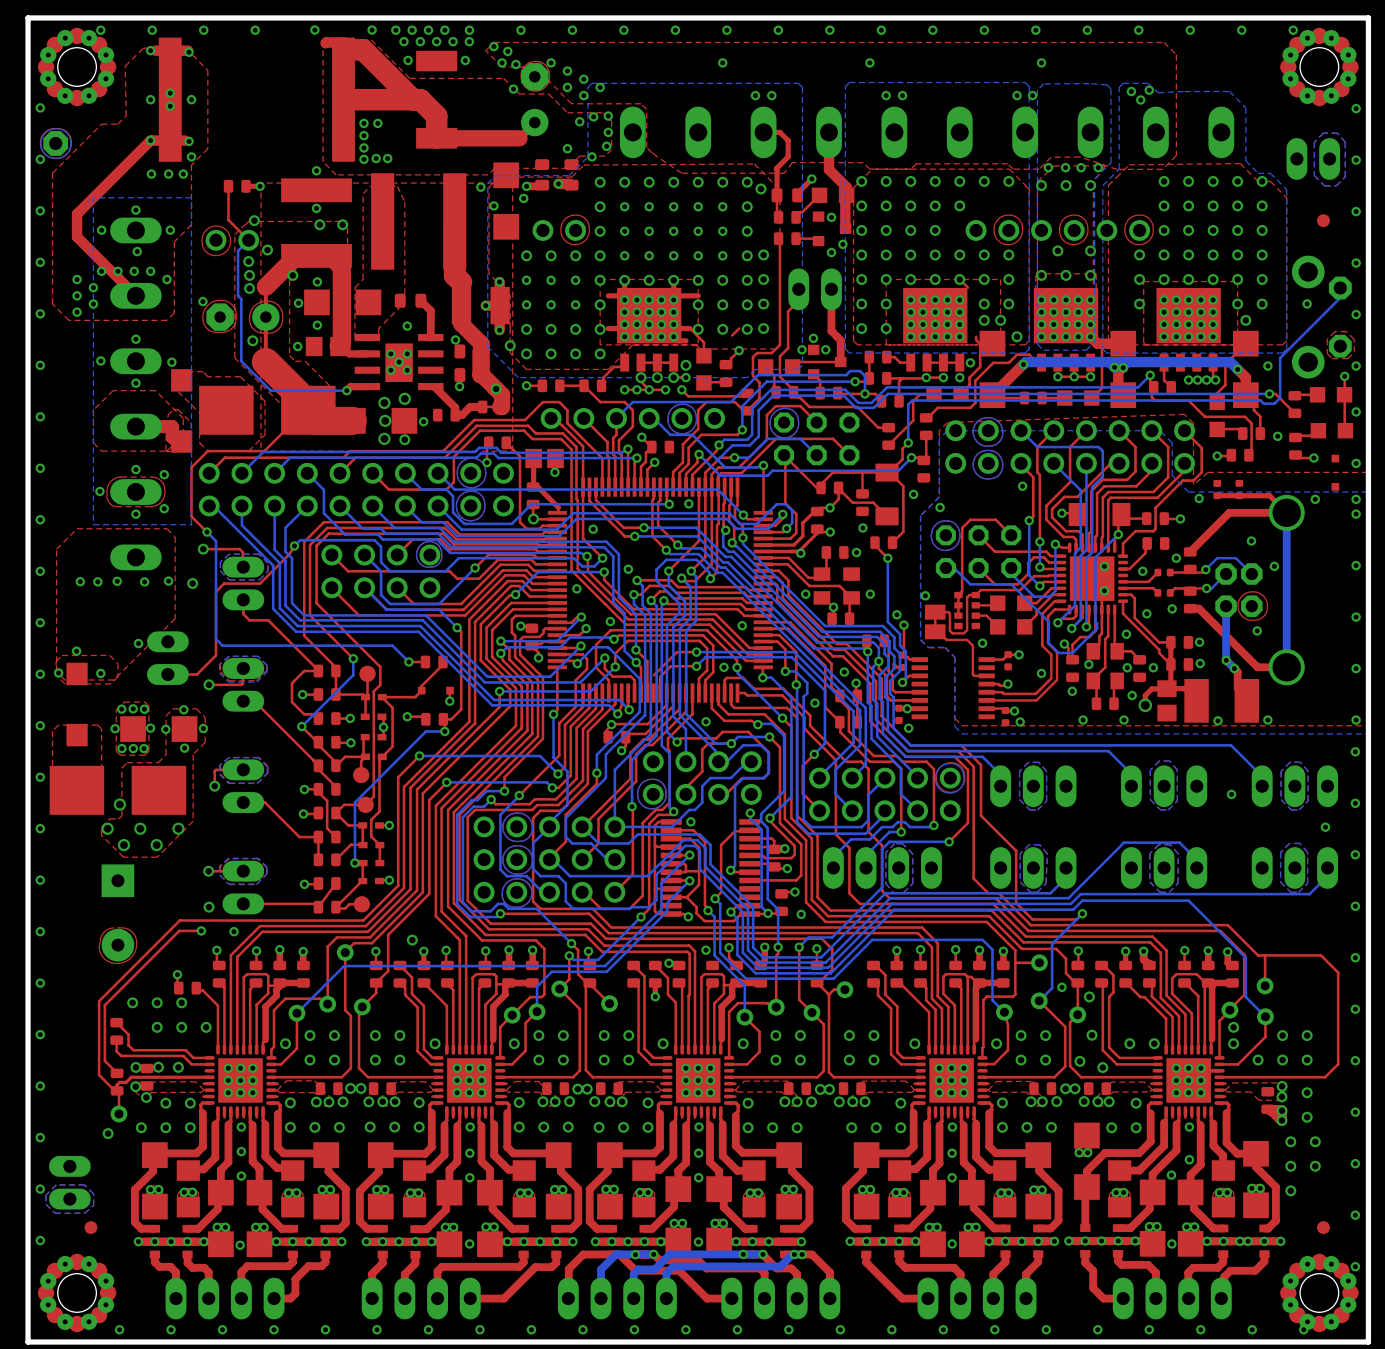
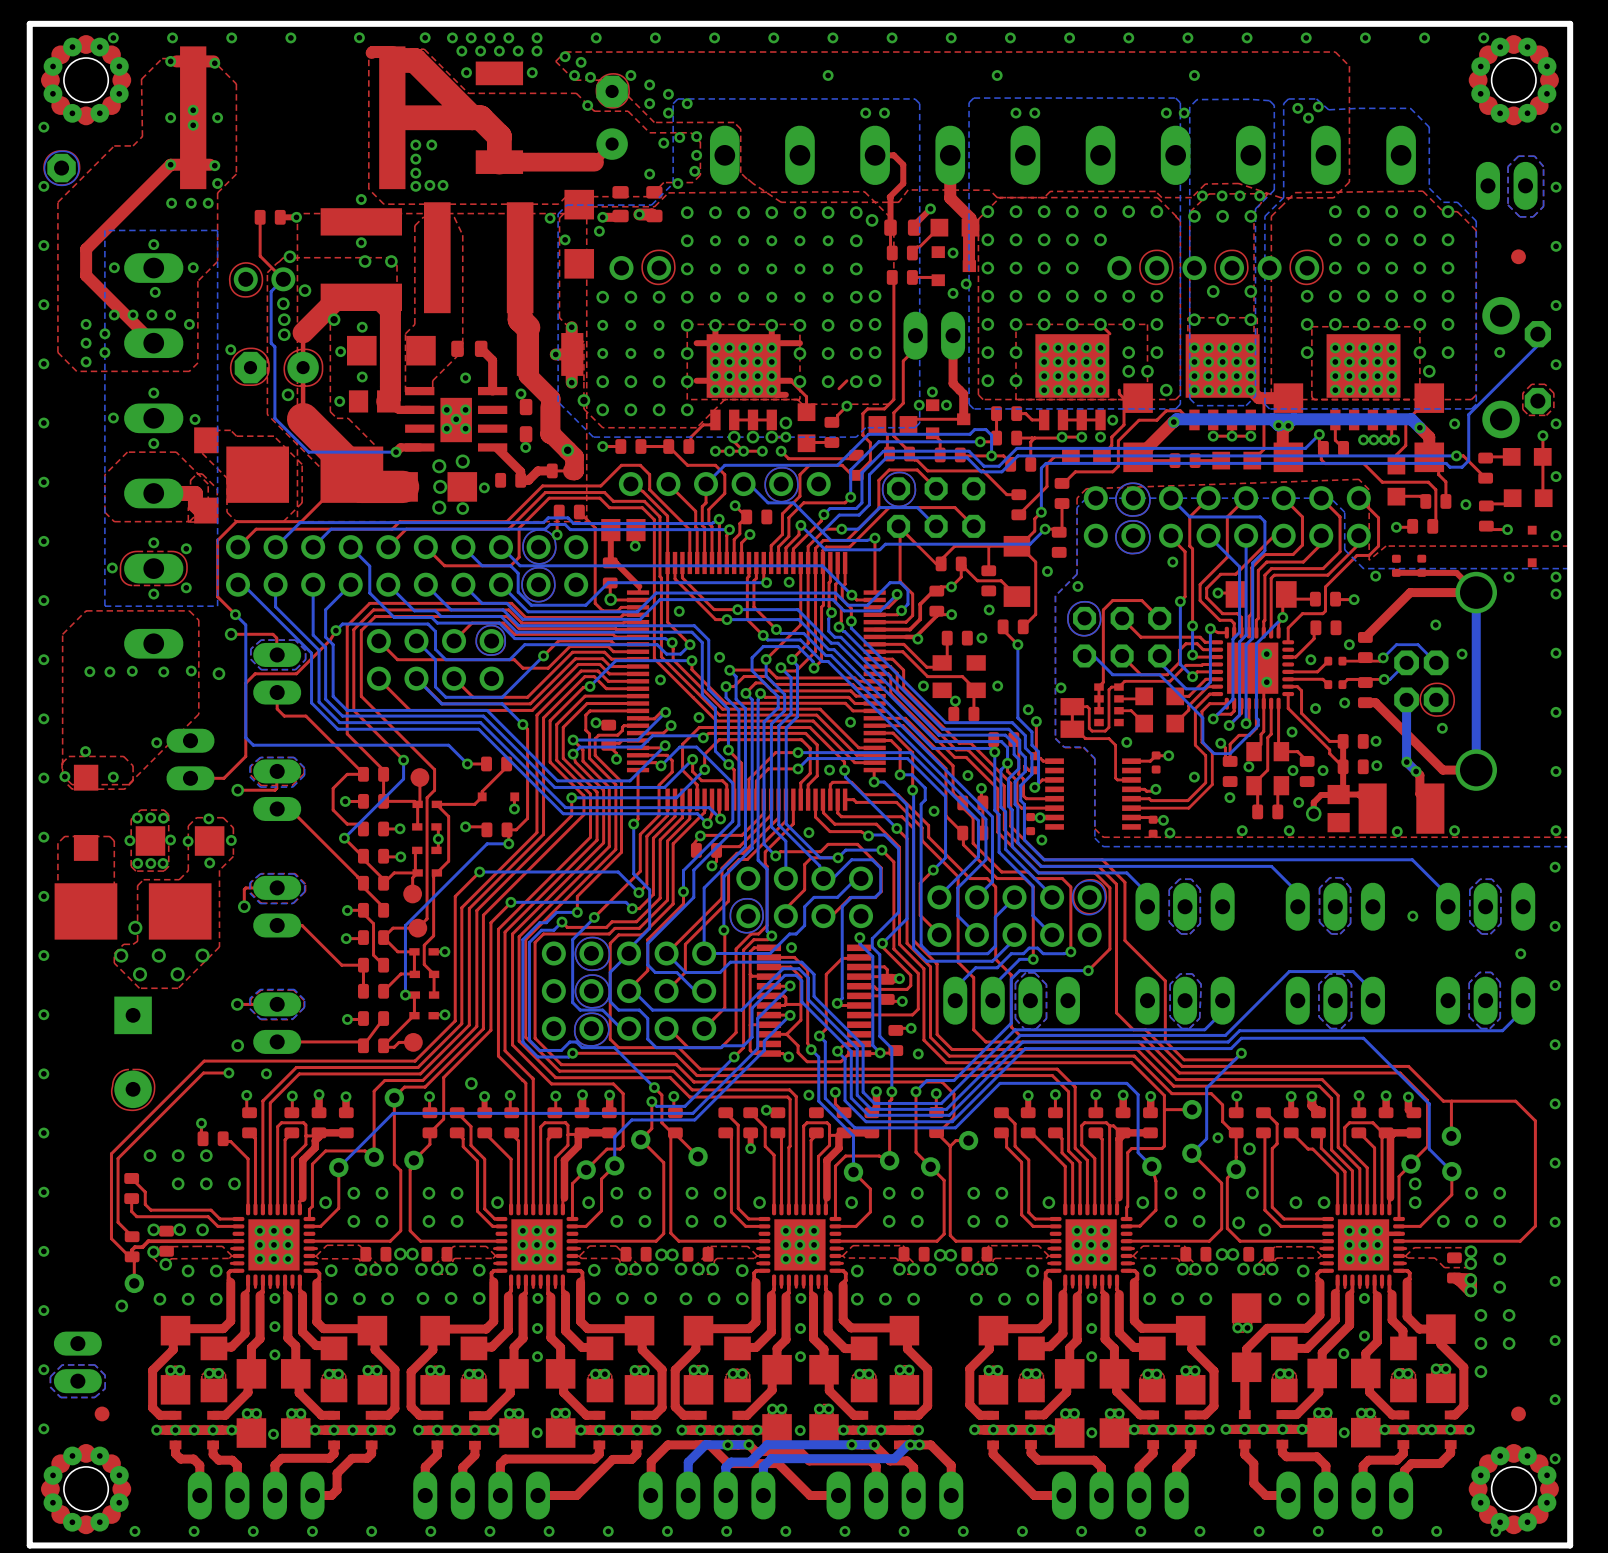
top track: none -> (748, 779) (748, 799)

